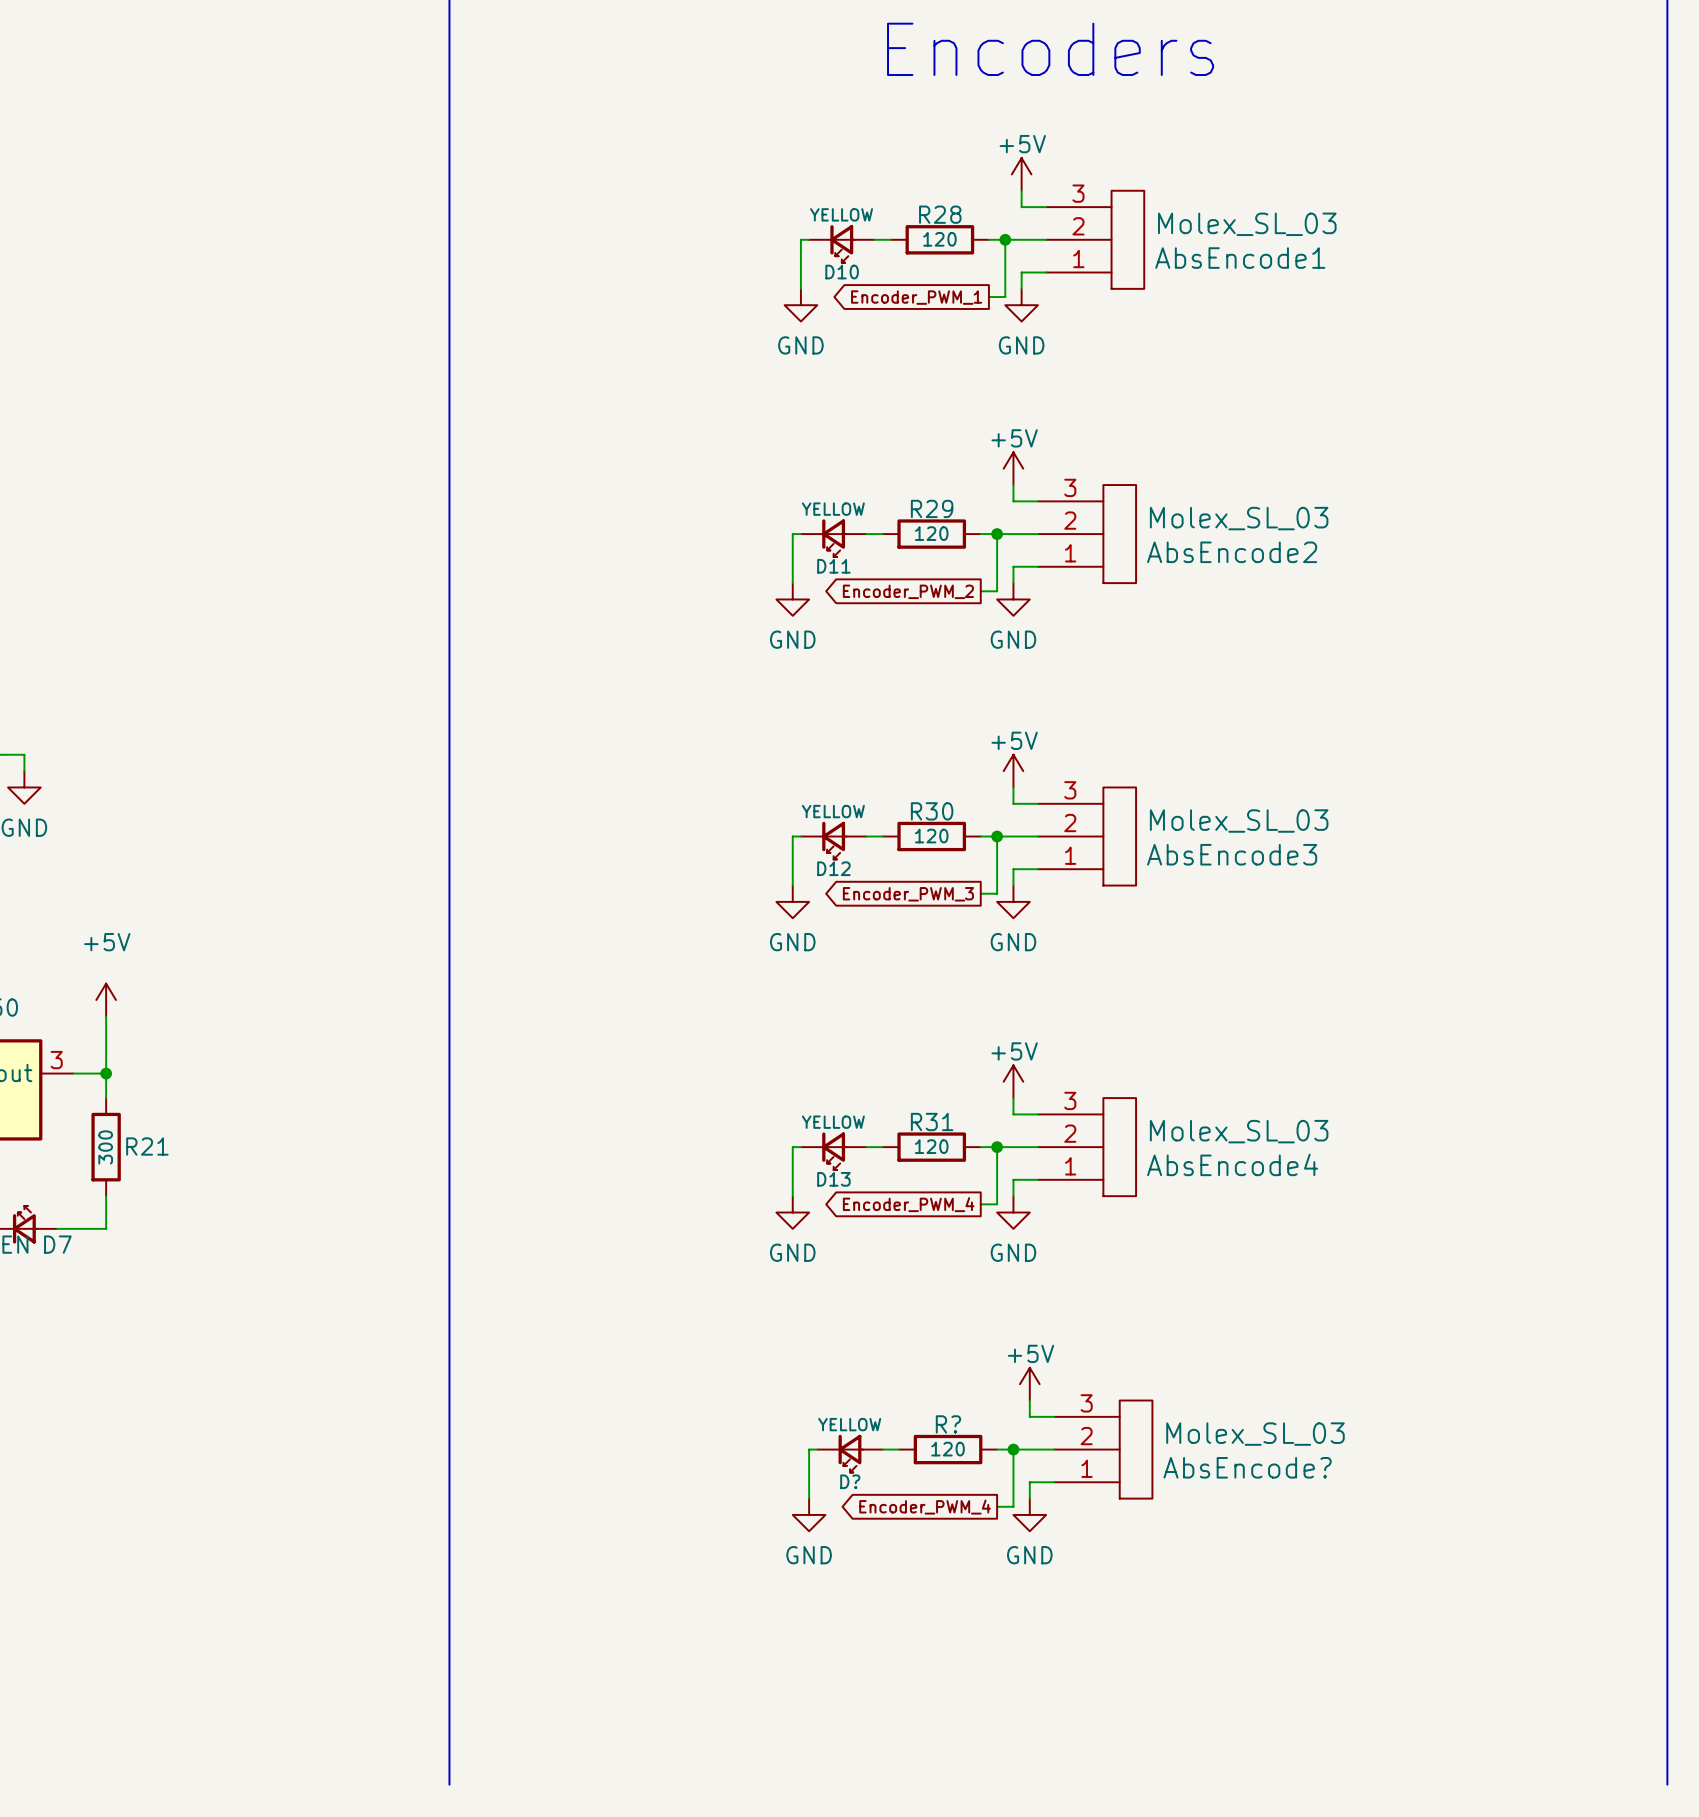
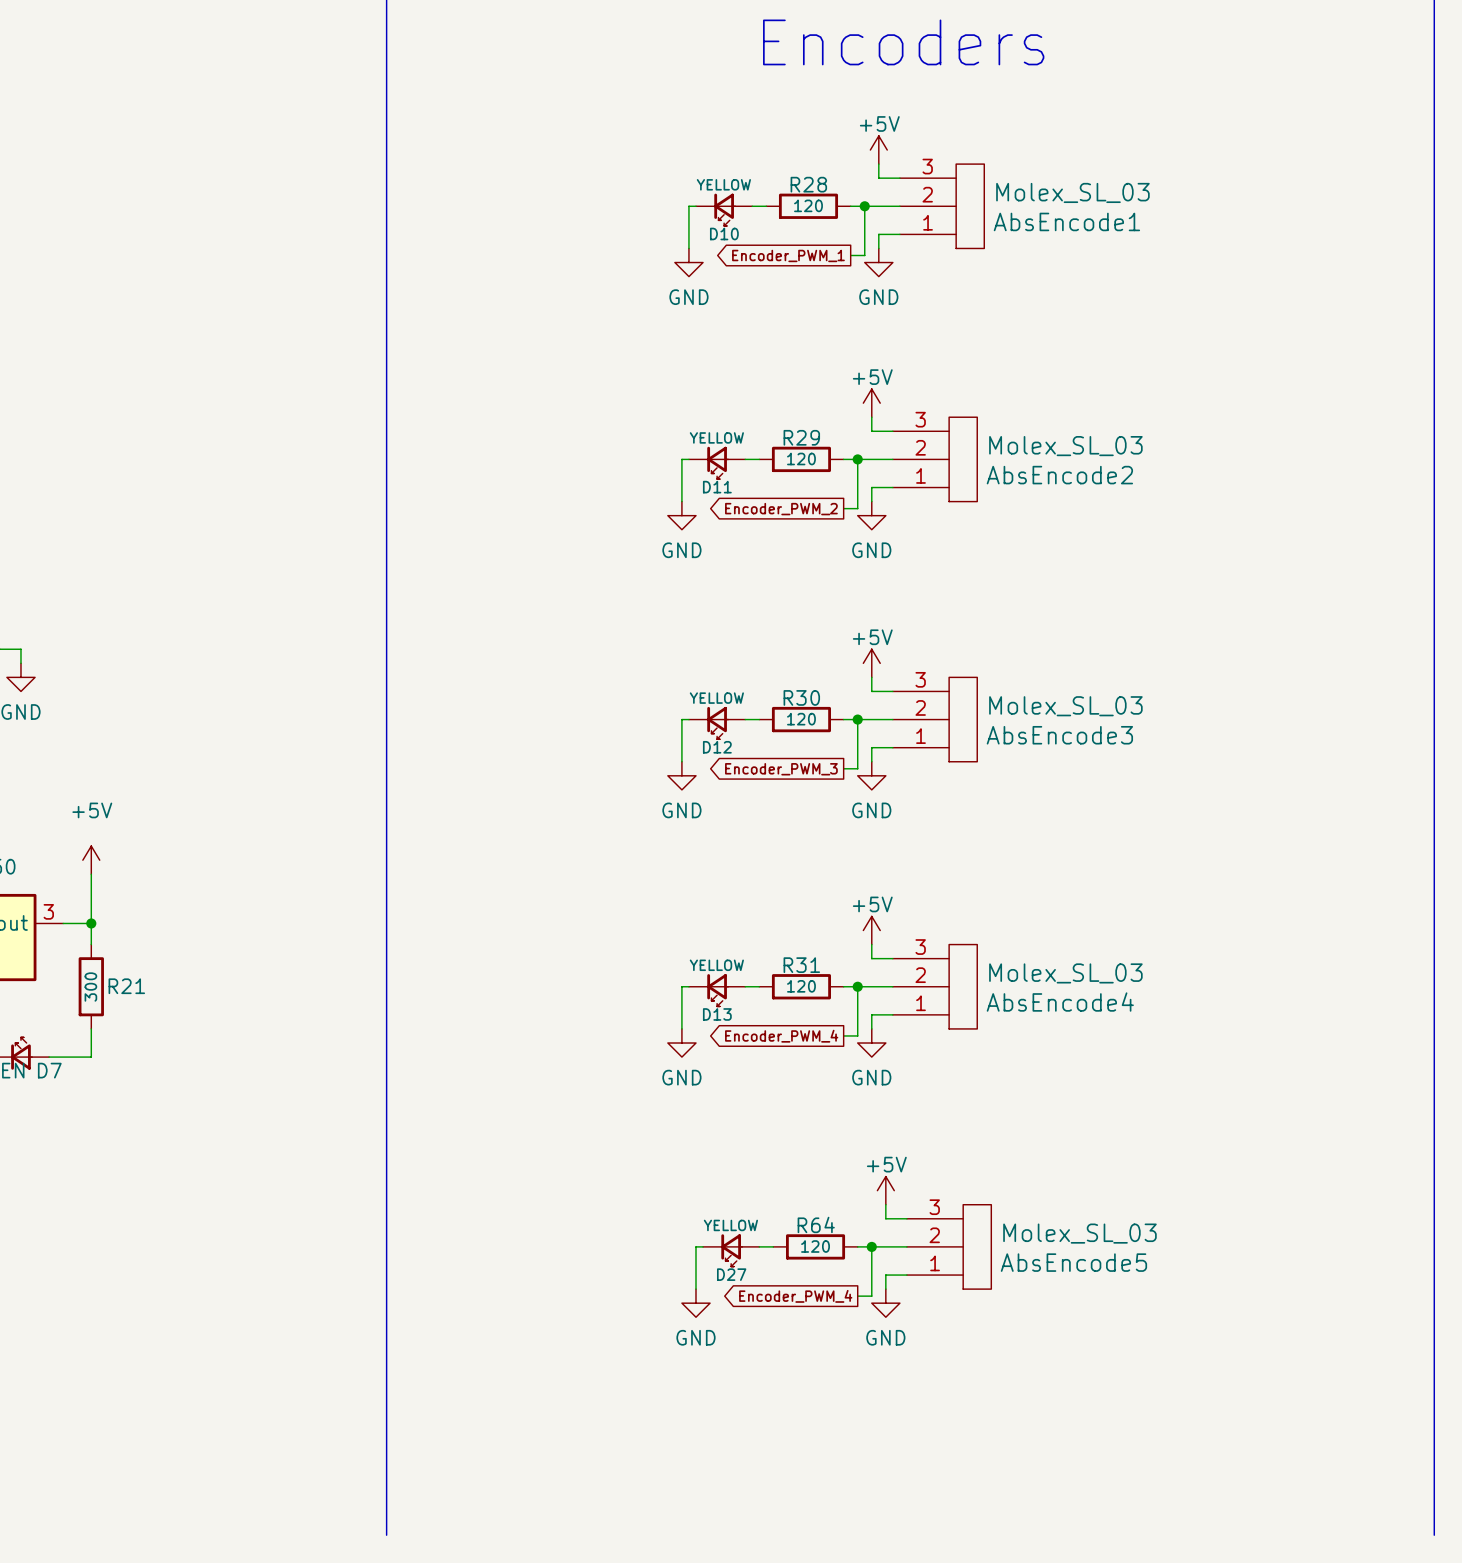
R? name: R? (948, 1424) -> R64 (816, 1224)
AbsEncode? name: AbsEncode? (1247, 1467) -> AbsEncode5 (1073, 1262)
D? name: D? (850, 1481) -> D27 (731, 1274)

